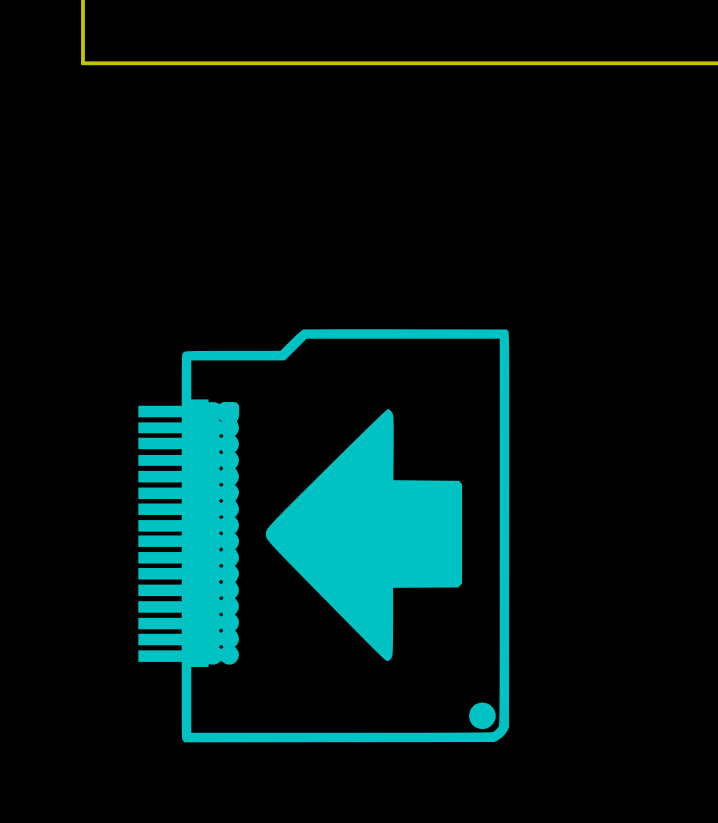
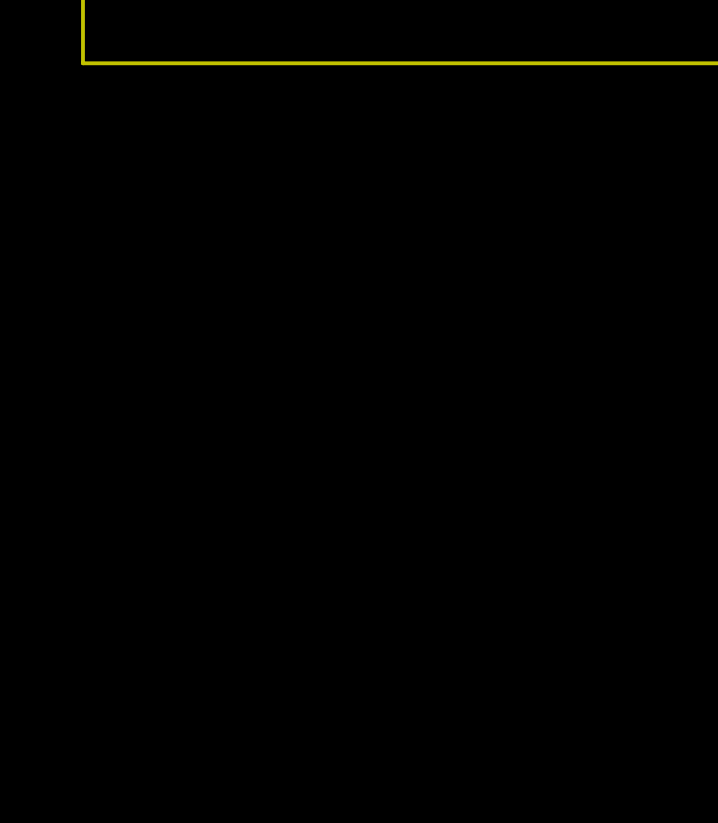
drawing: [138, 329, 510, 743] -> none

